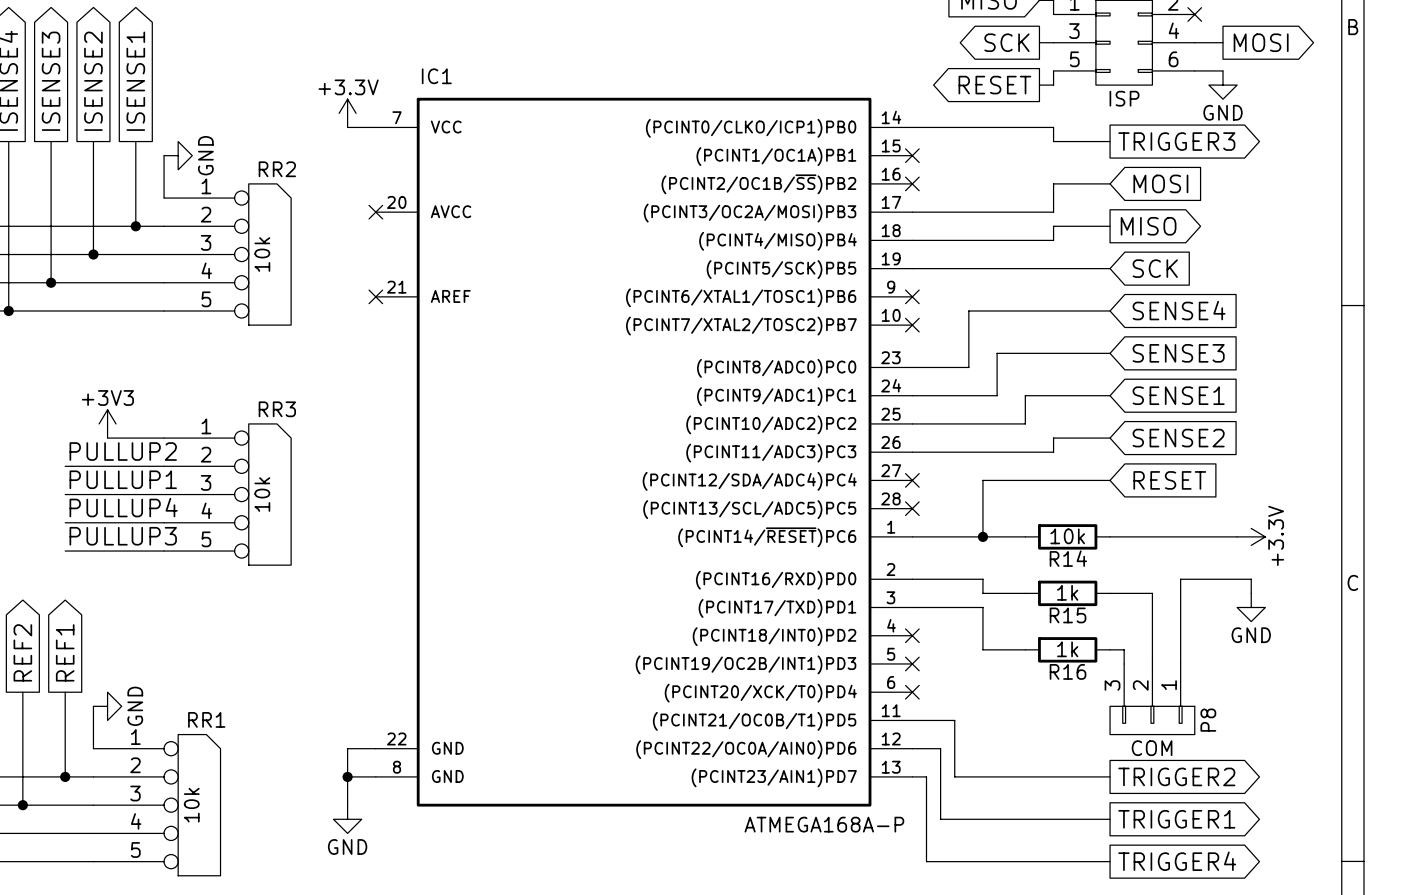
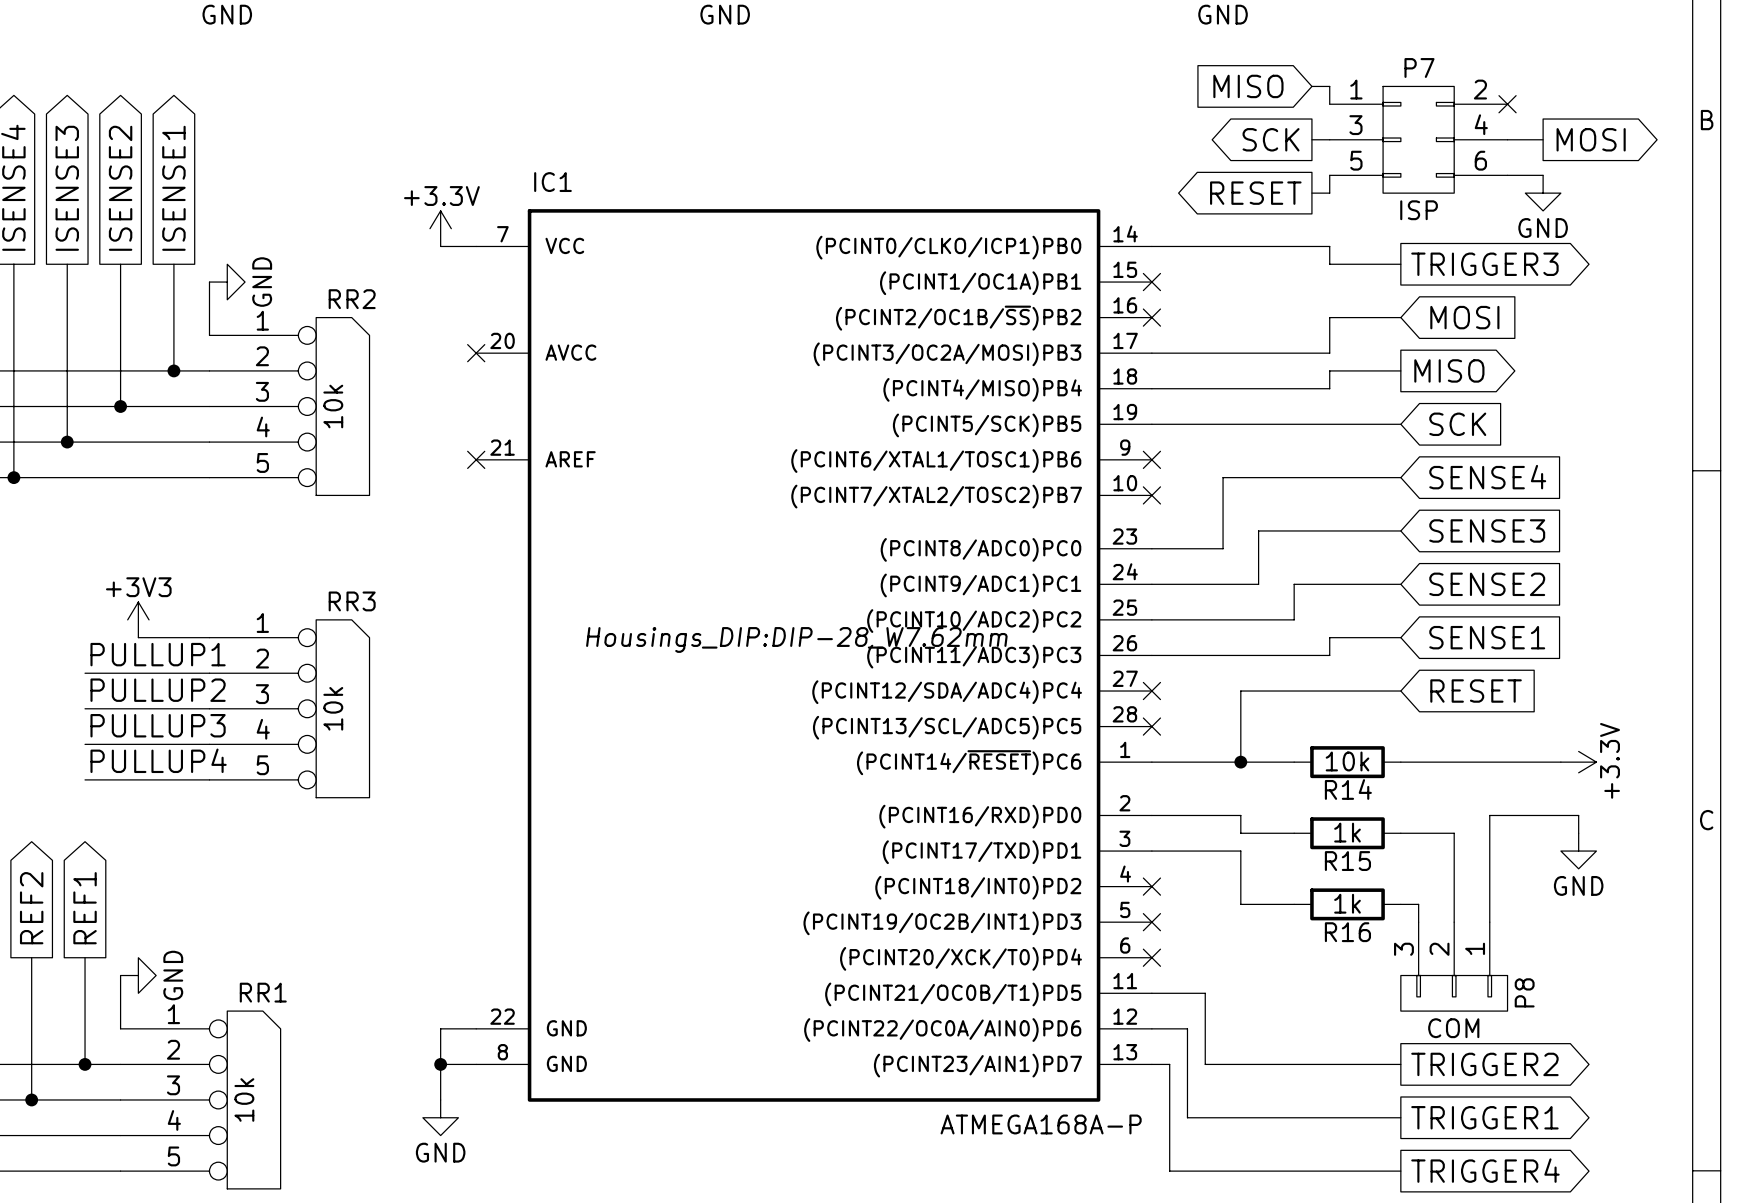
global label: SENSE1 (1178, 395) -> SENSE2 (1487, 584)
global label: SENSE2 (1178, 438) -> SENSE1 (1487, 637)
IC1 text: none -> Housings_DIP:DIP-28_W7.62mm (796, 639)
label: PULLUP2 (123, 451) -> PULLUP1 (158, 654)
label: PULLUP1 (123, 479) -> PULLUP2 (158, 690)
label: PULLUP4 (123, 507) -> PULLUP3 (158, 725)
label: PULLUP3 (123, 536) -> PULLUP4 (158, 760)

